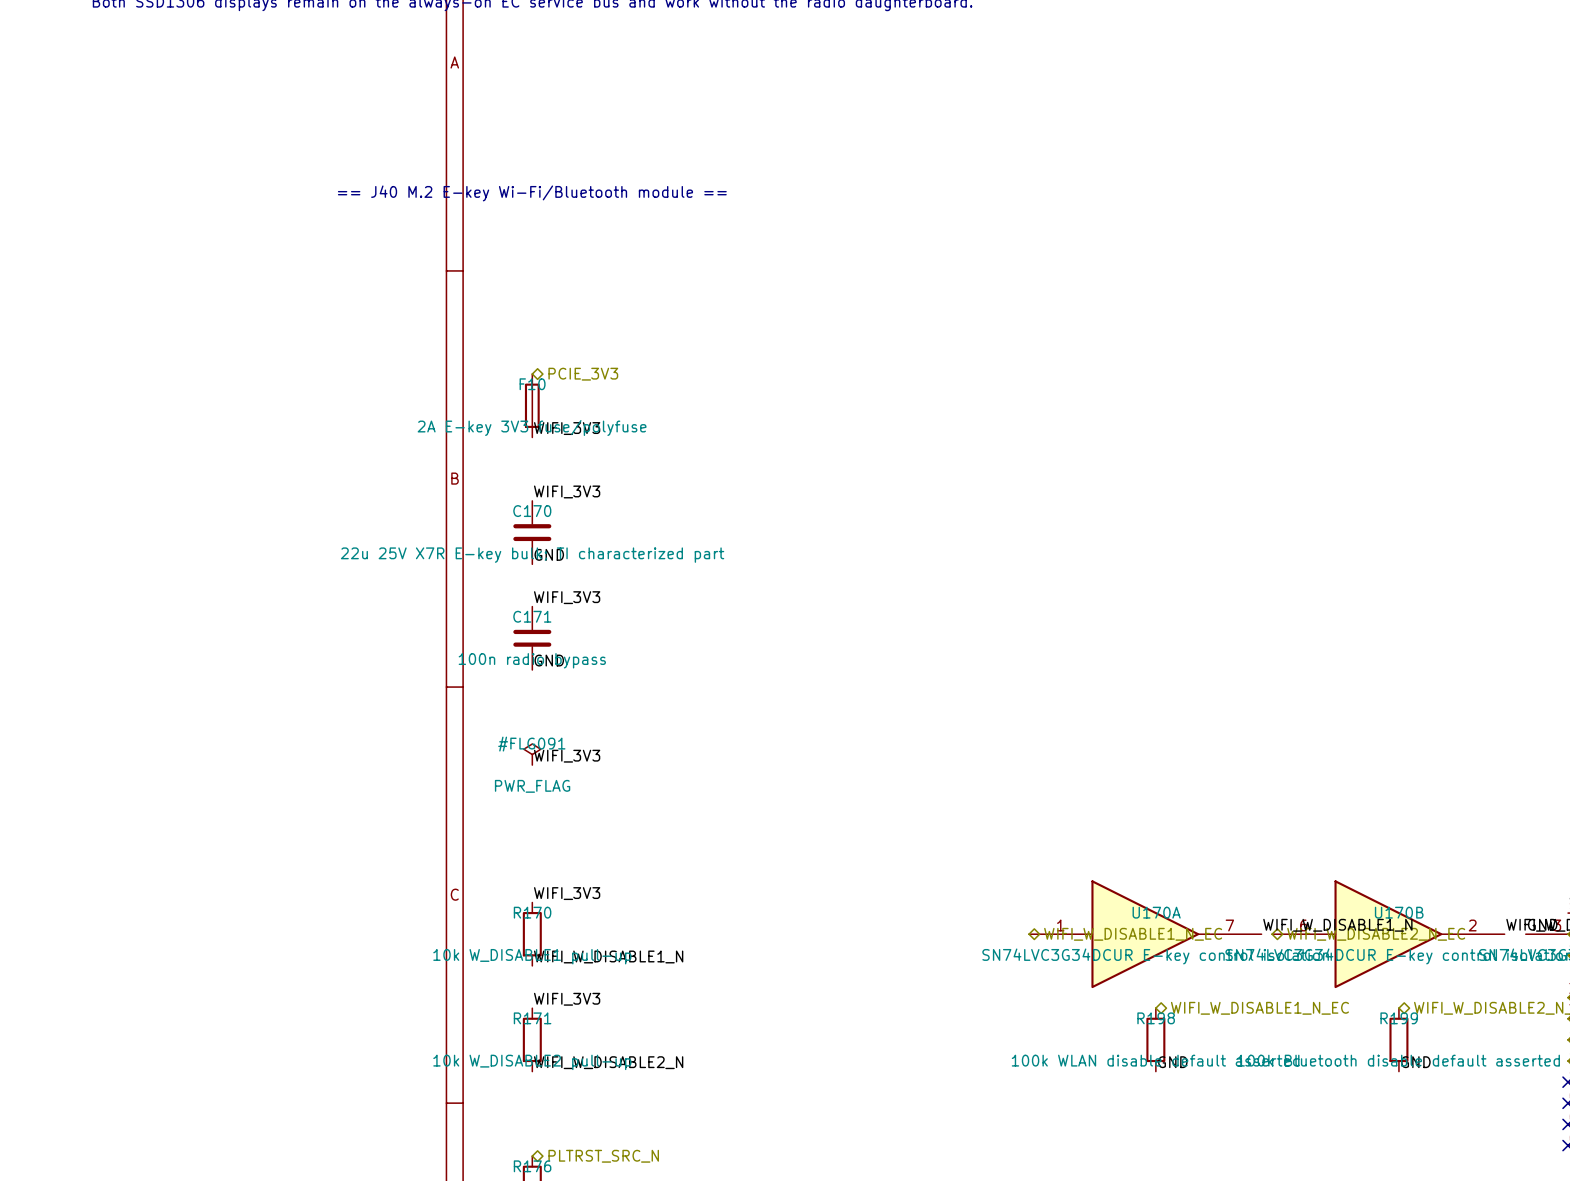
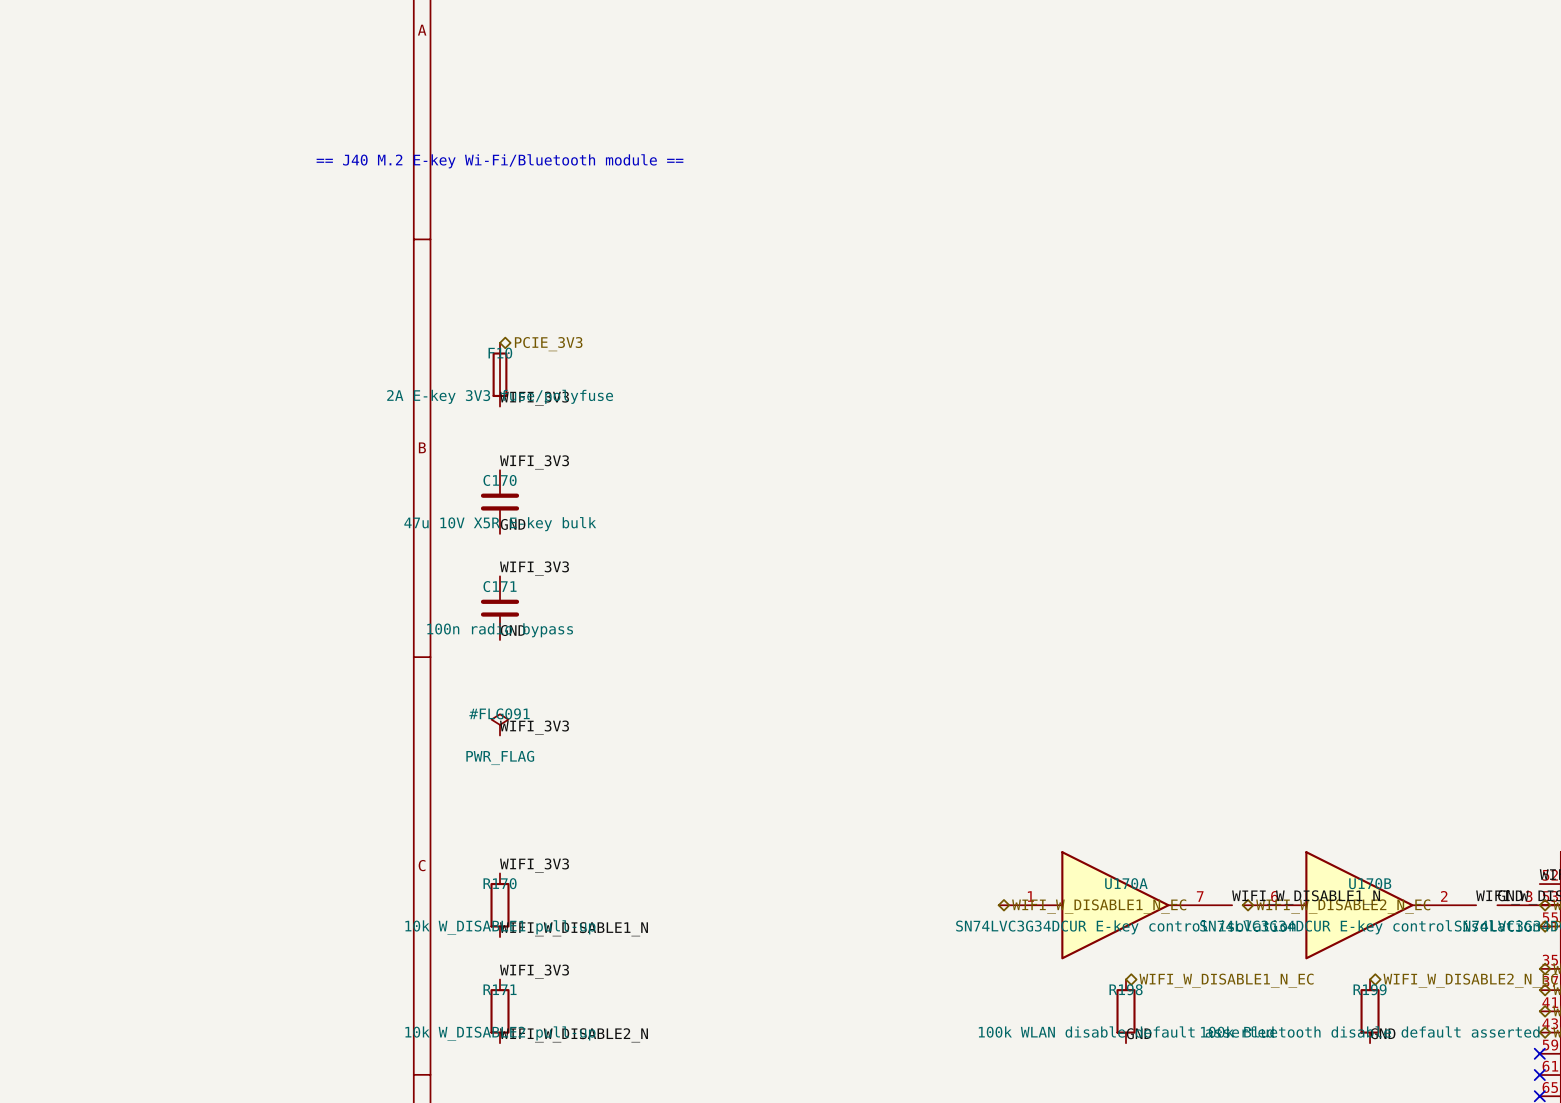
C170 value: 22u 25V X7R E-key bulk; TI characterized part (532, 555) -> 47u 10V X5R E-key bulk (500, 524)

